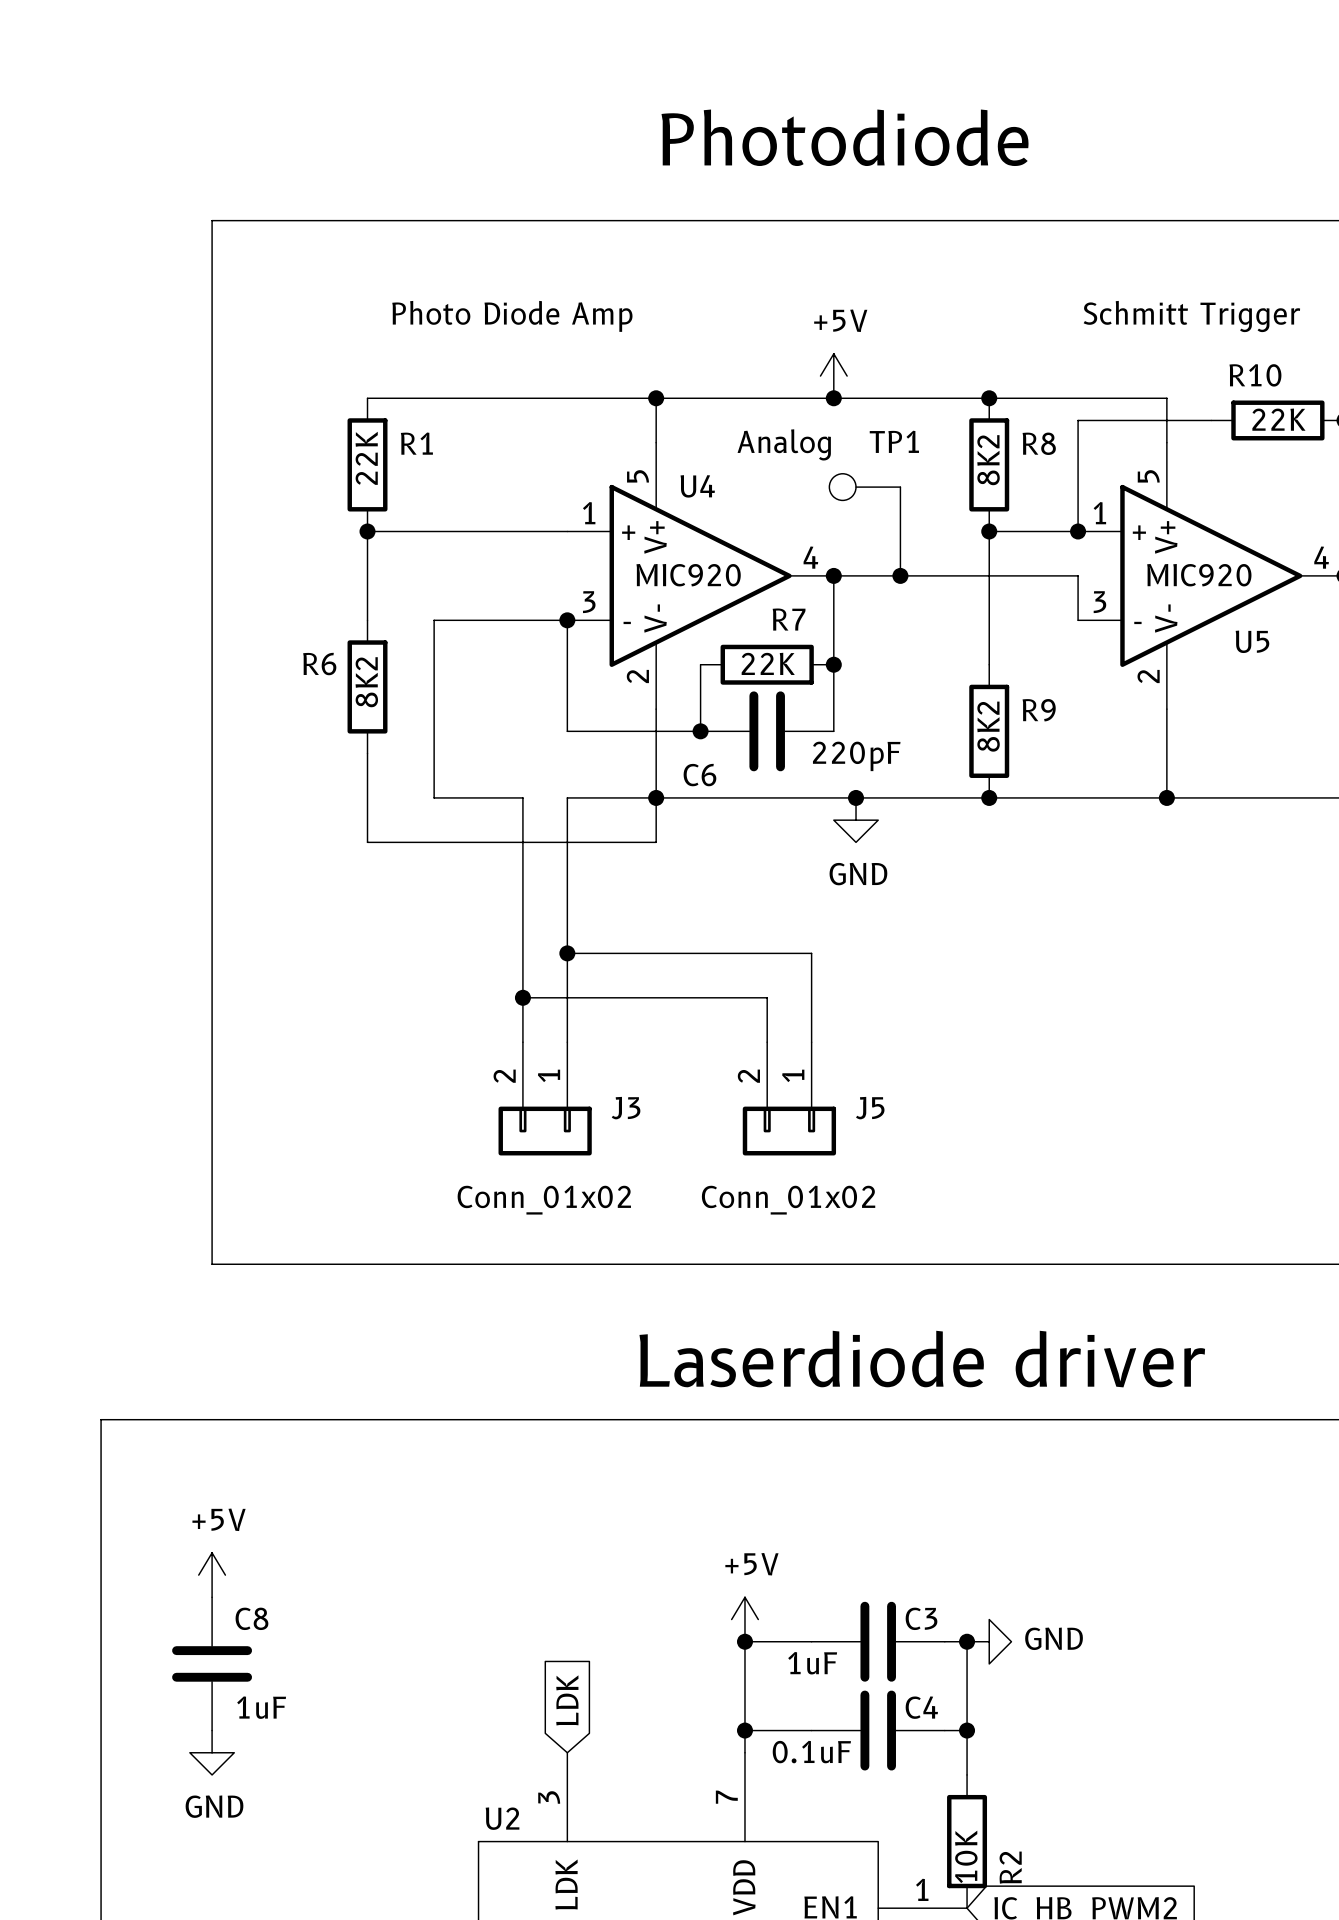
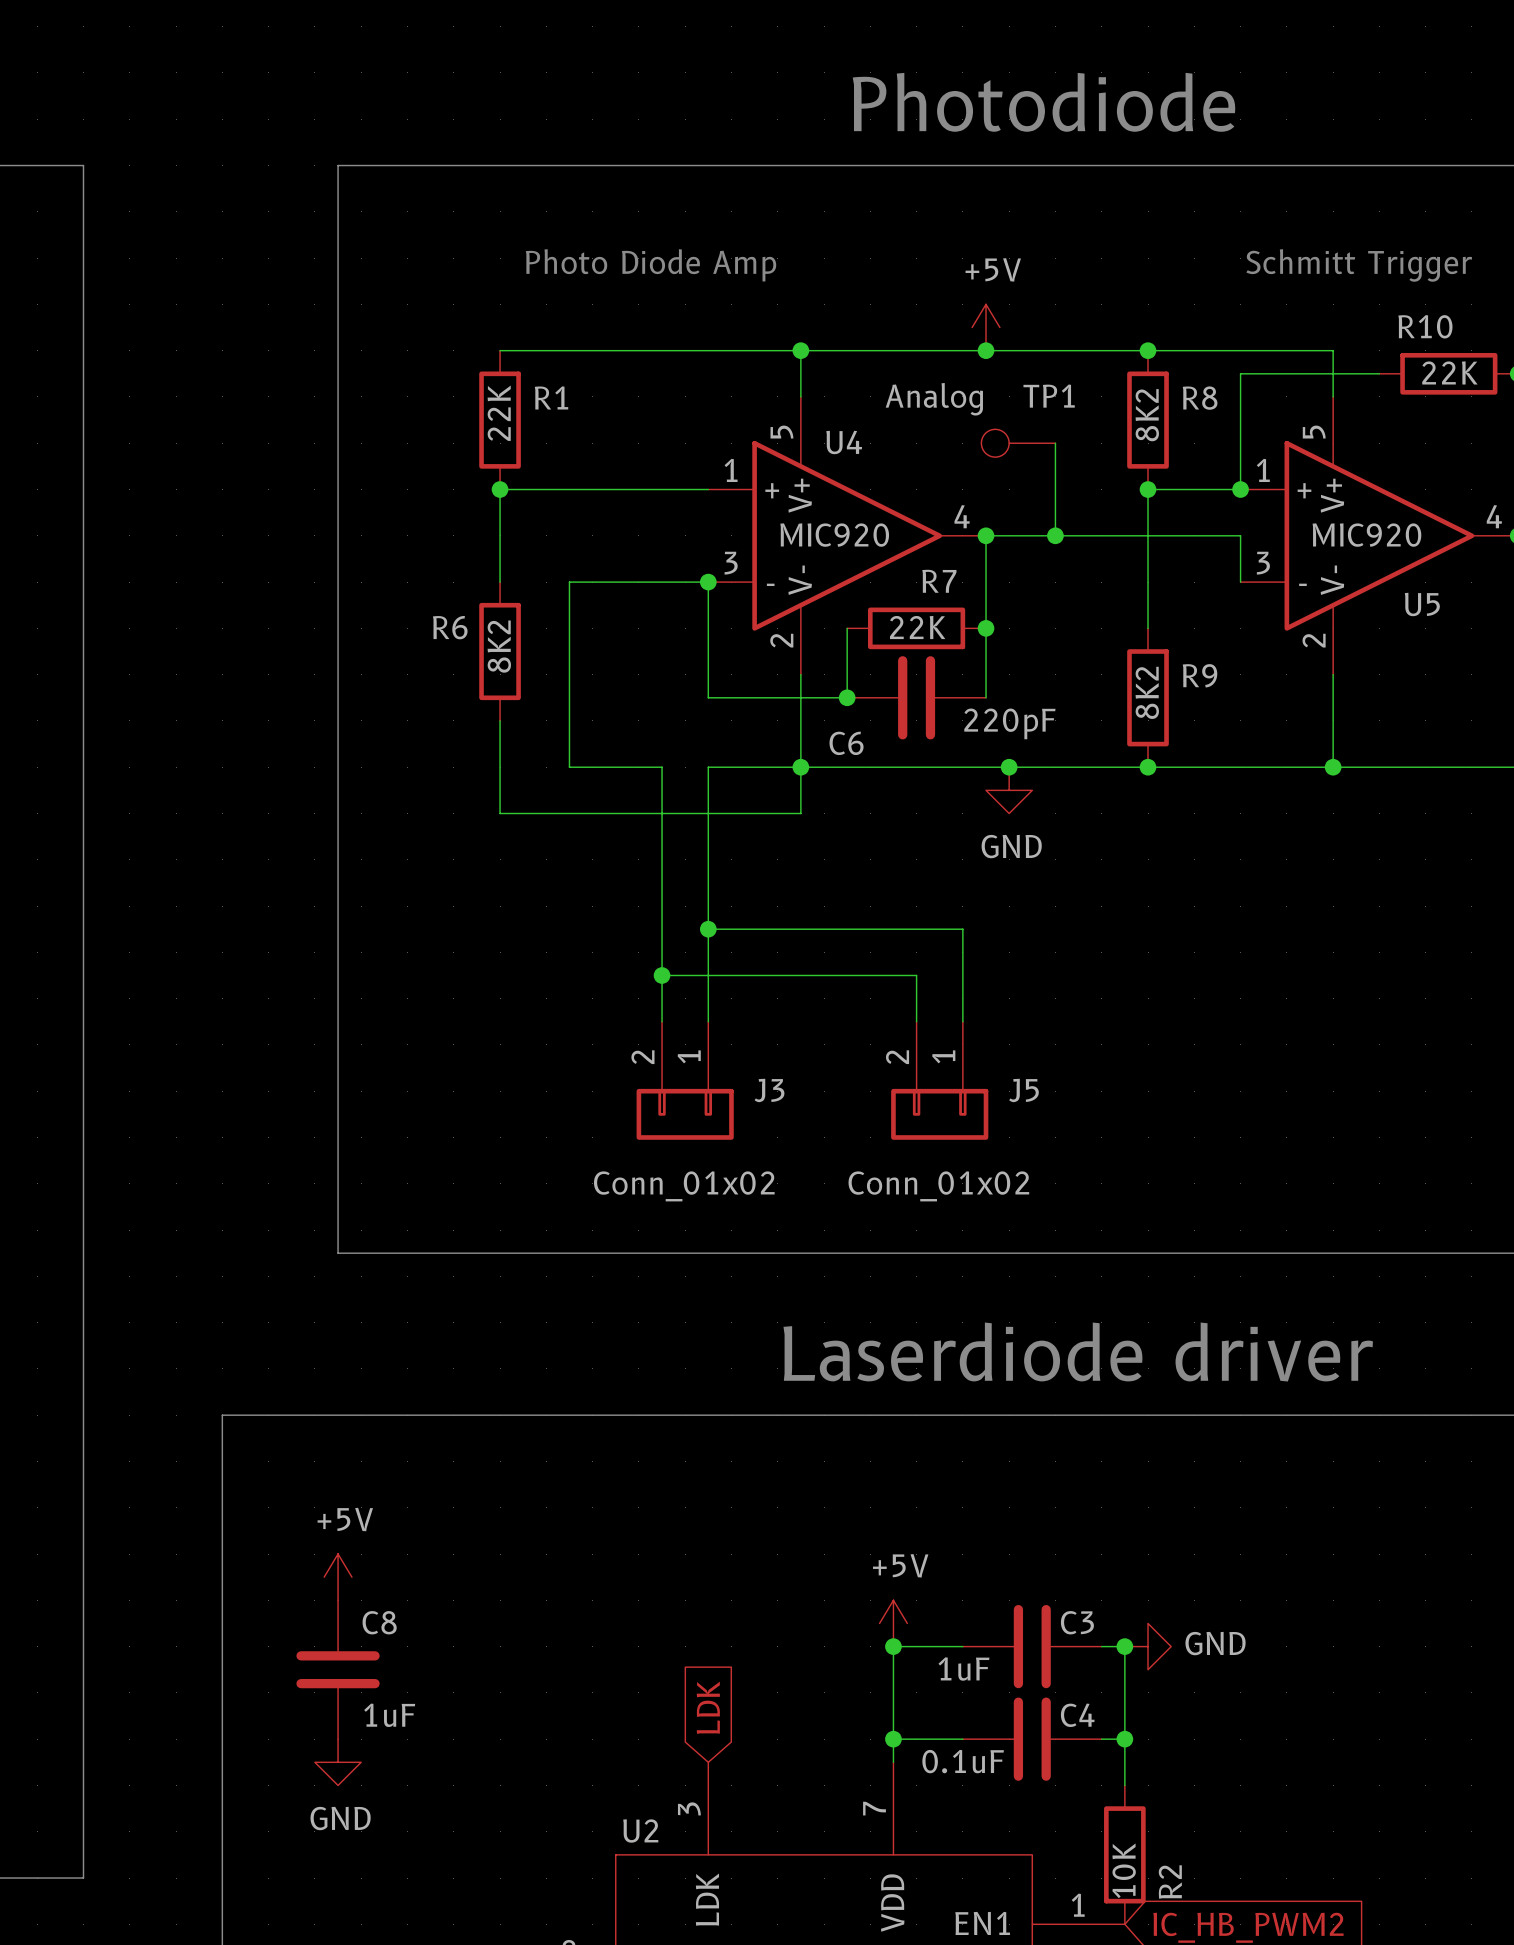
text position: Photodiode (845, 137) -> Photodiode (1043, 102)

